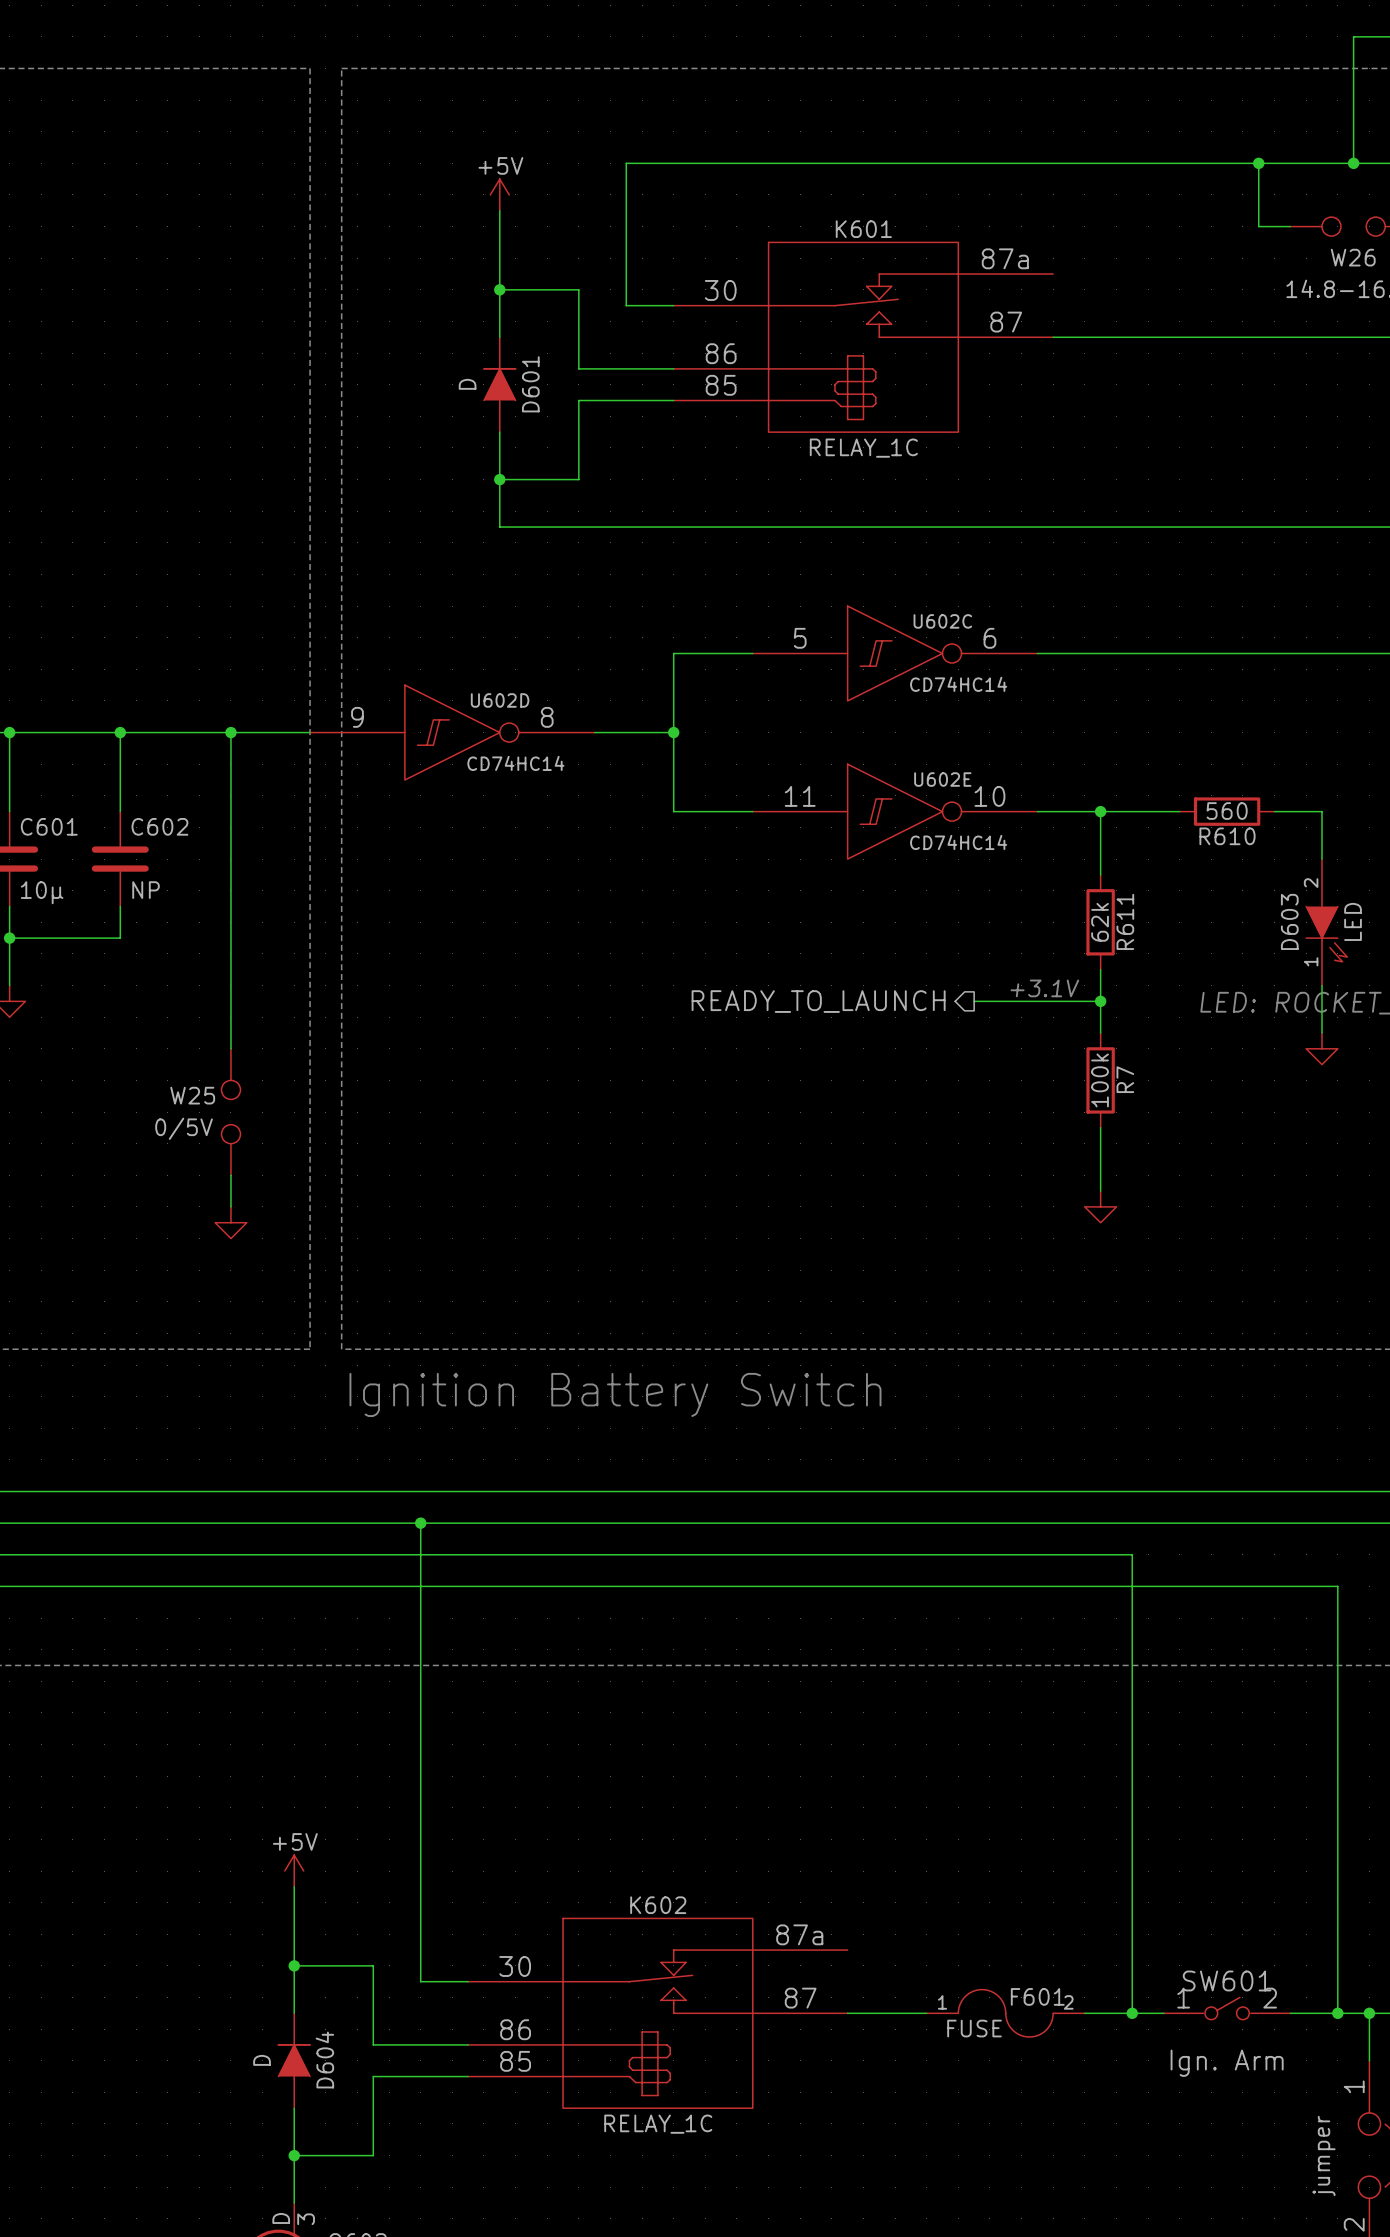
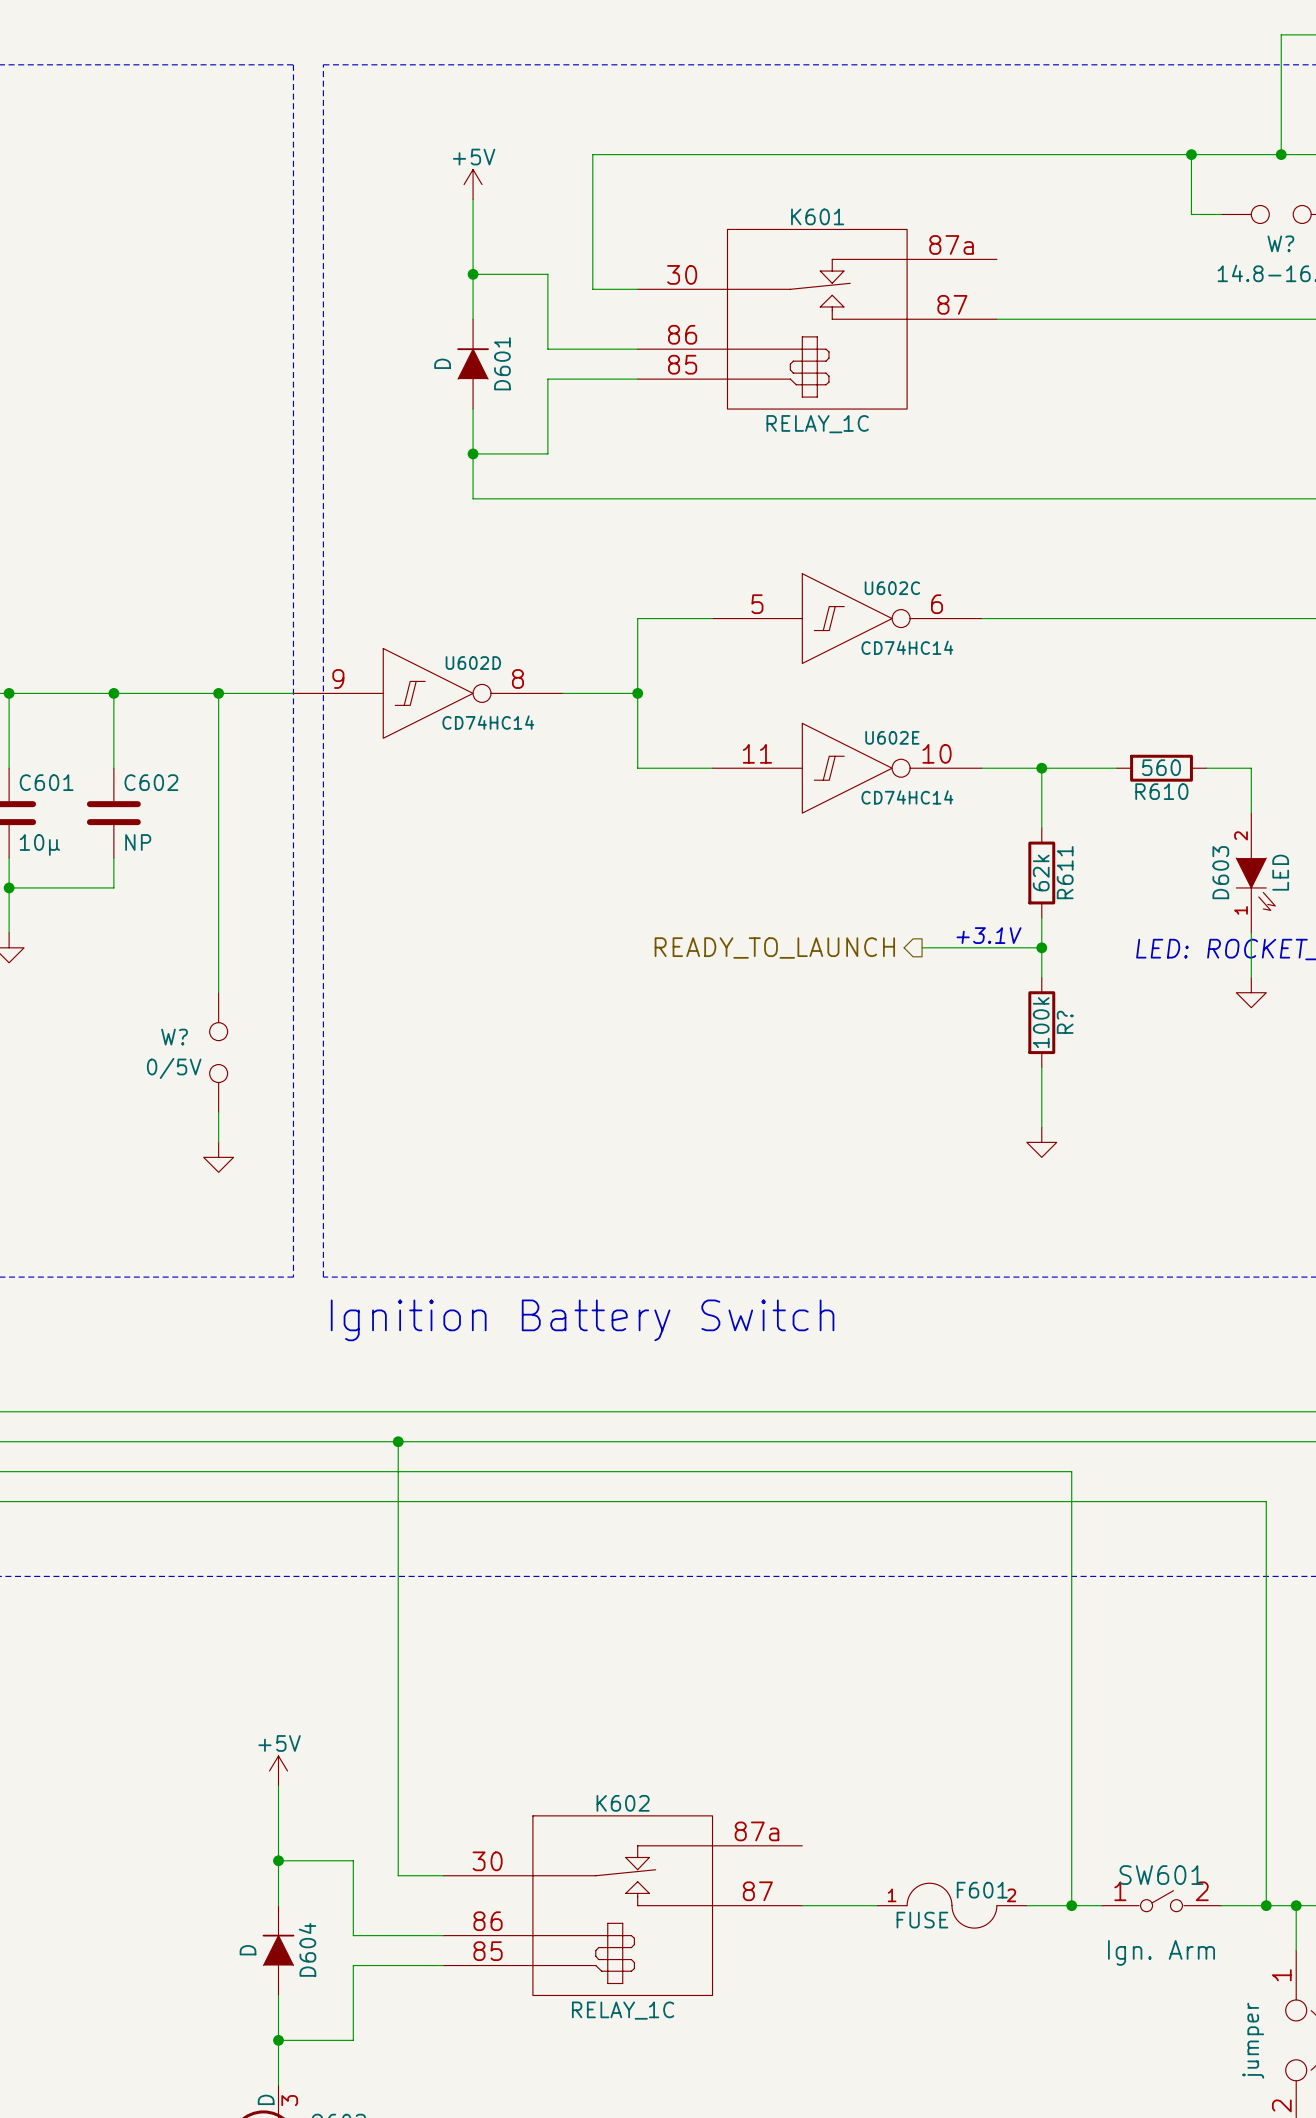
W26 name: W26 (1353, 257) -> W? (1280, 243)
R7 name: R7 (1125, 1079) -> R? (1065, 1022)
W25 name: W25 (192, 1095) -> W? (174, 1037)

